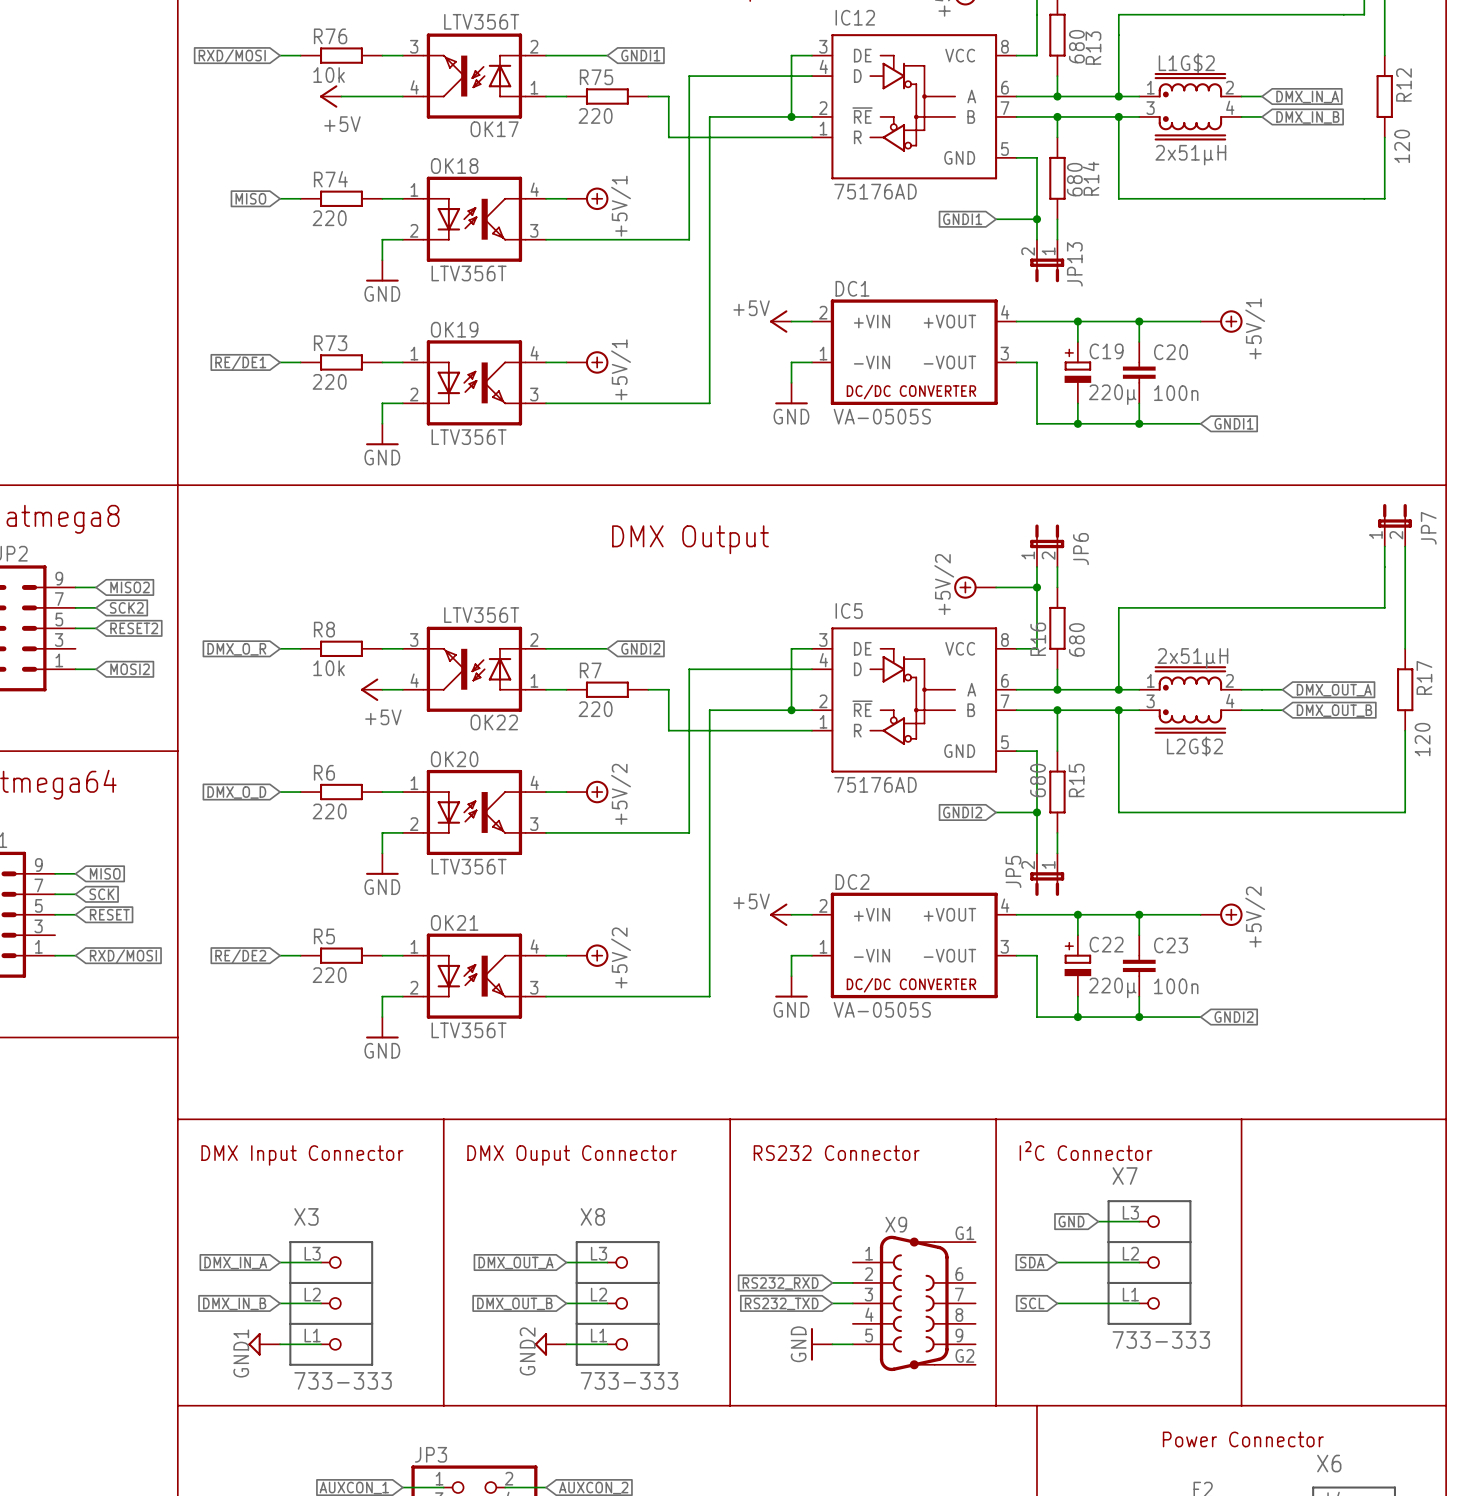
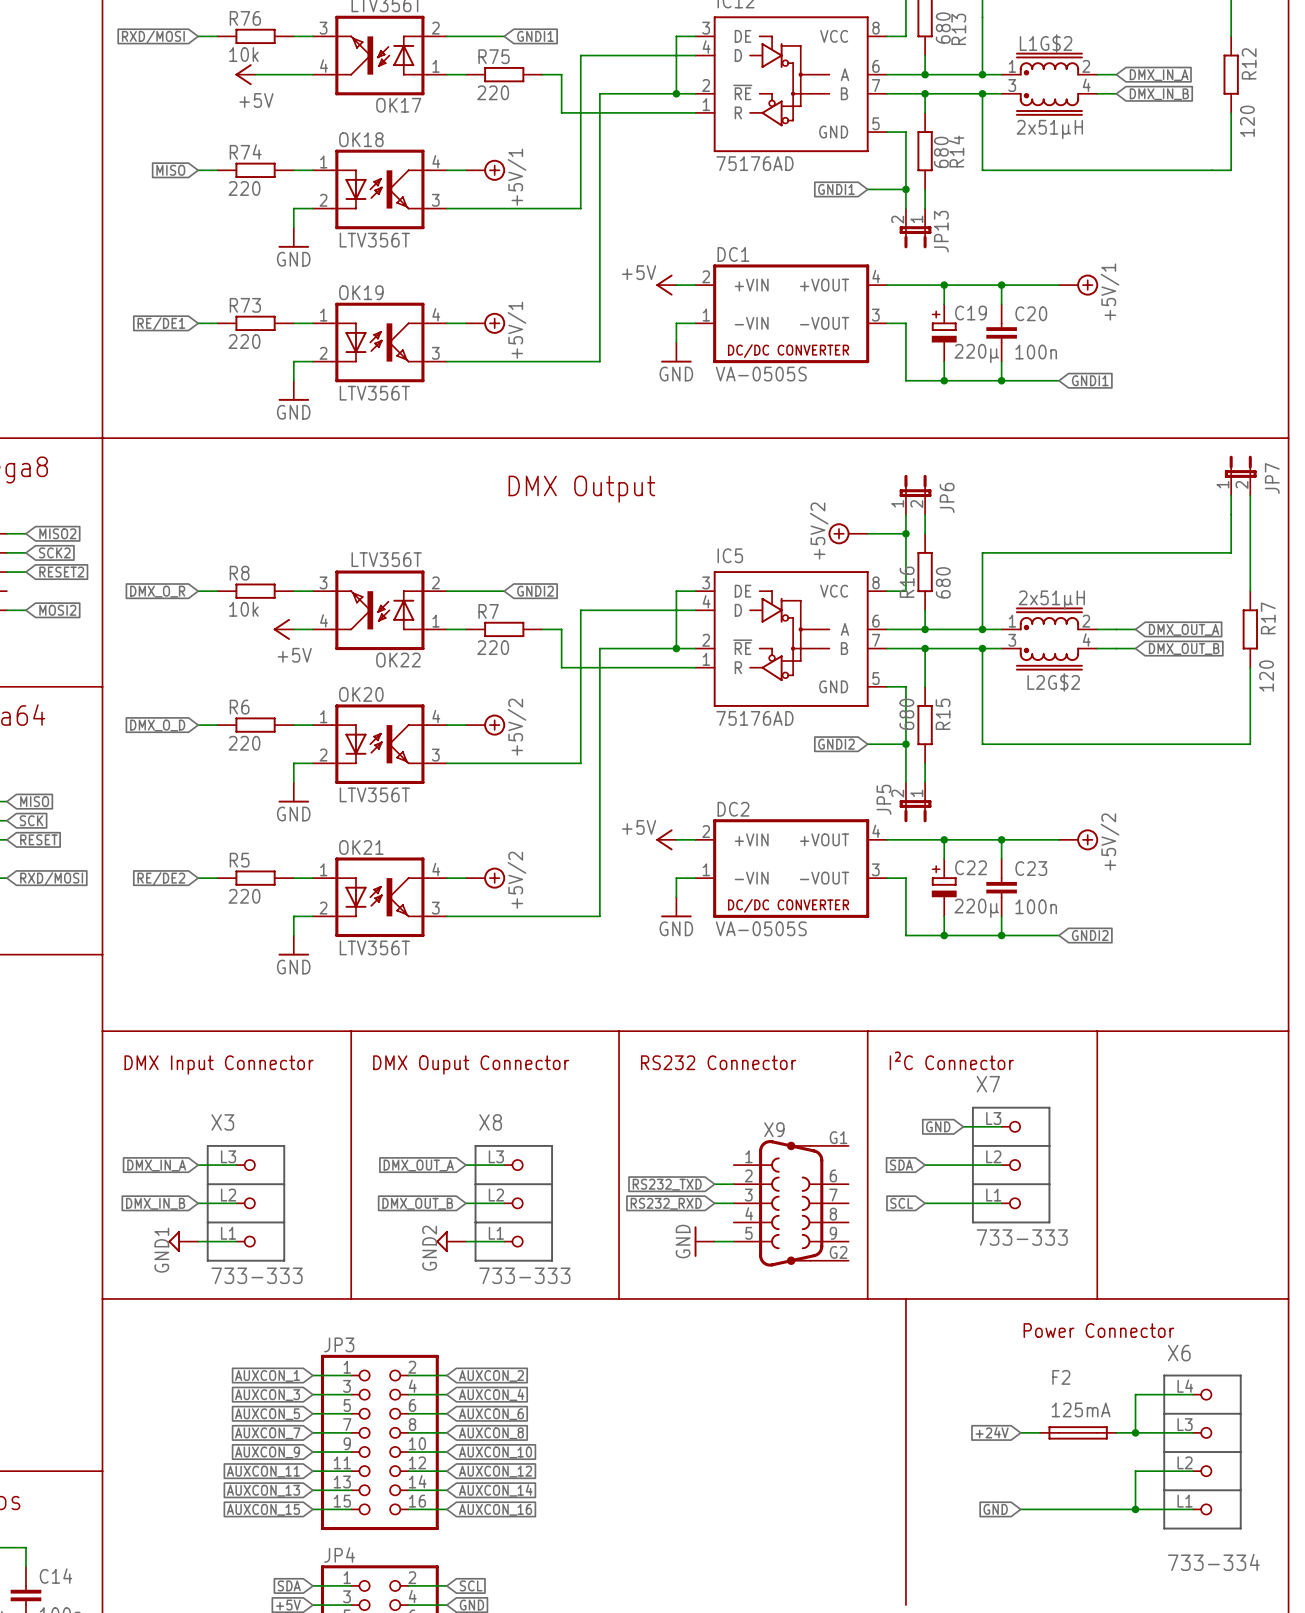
global label: RS232_RXD (780, 1283) -> RS232_TXD (667, 1184)
global label: RS232_TXD (781, 1303) -> RS232_RXD (666, 1203)

